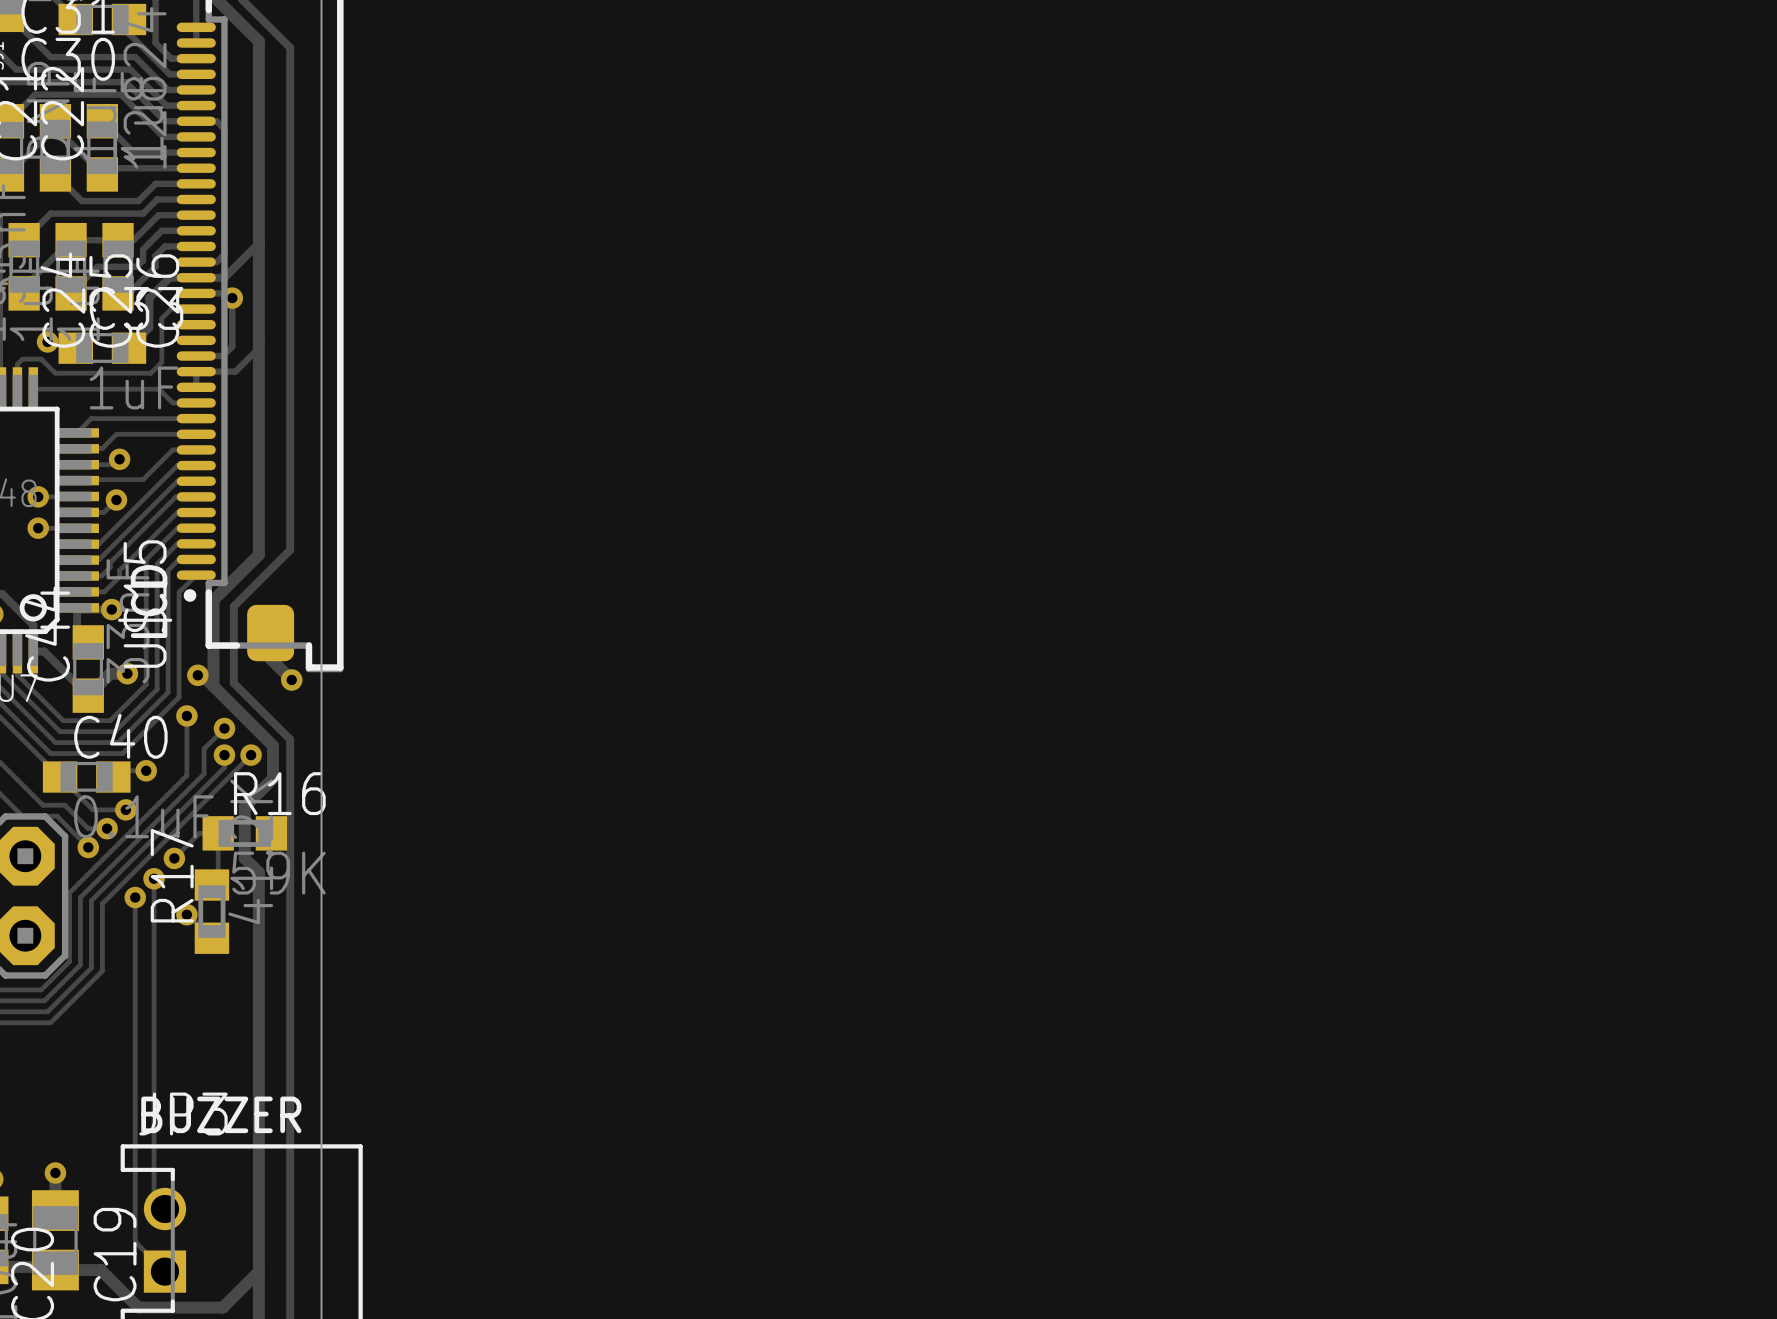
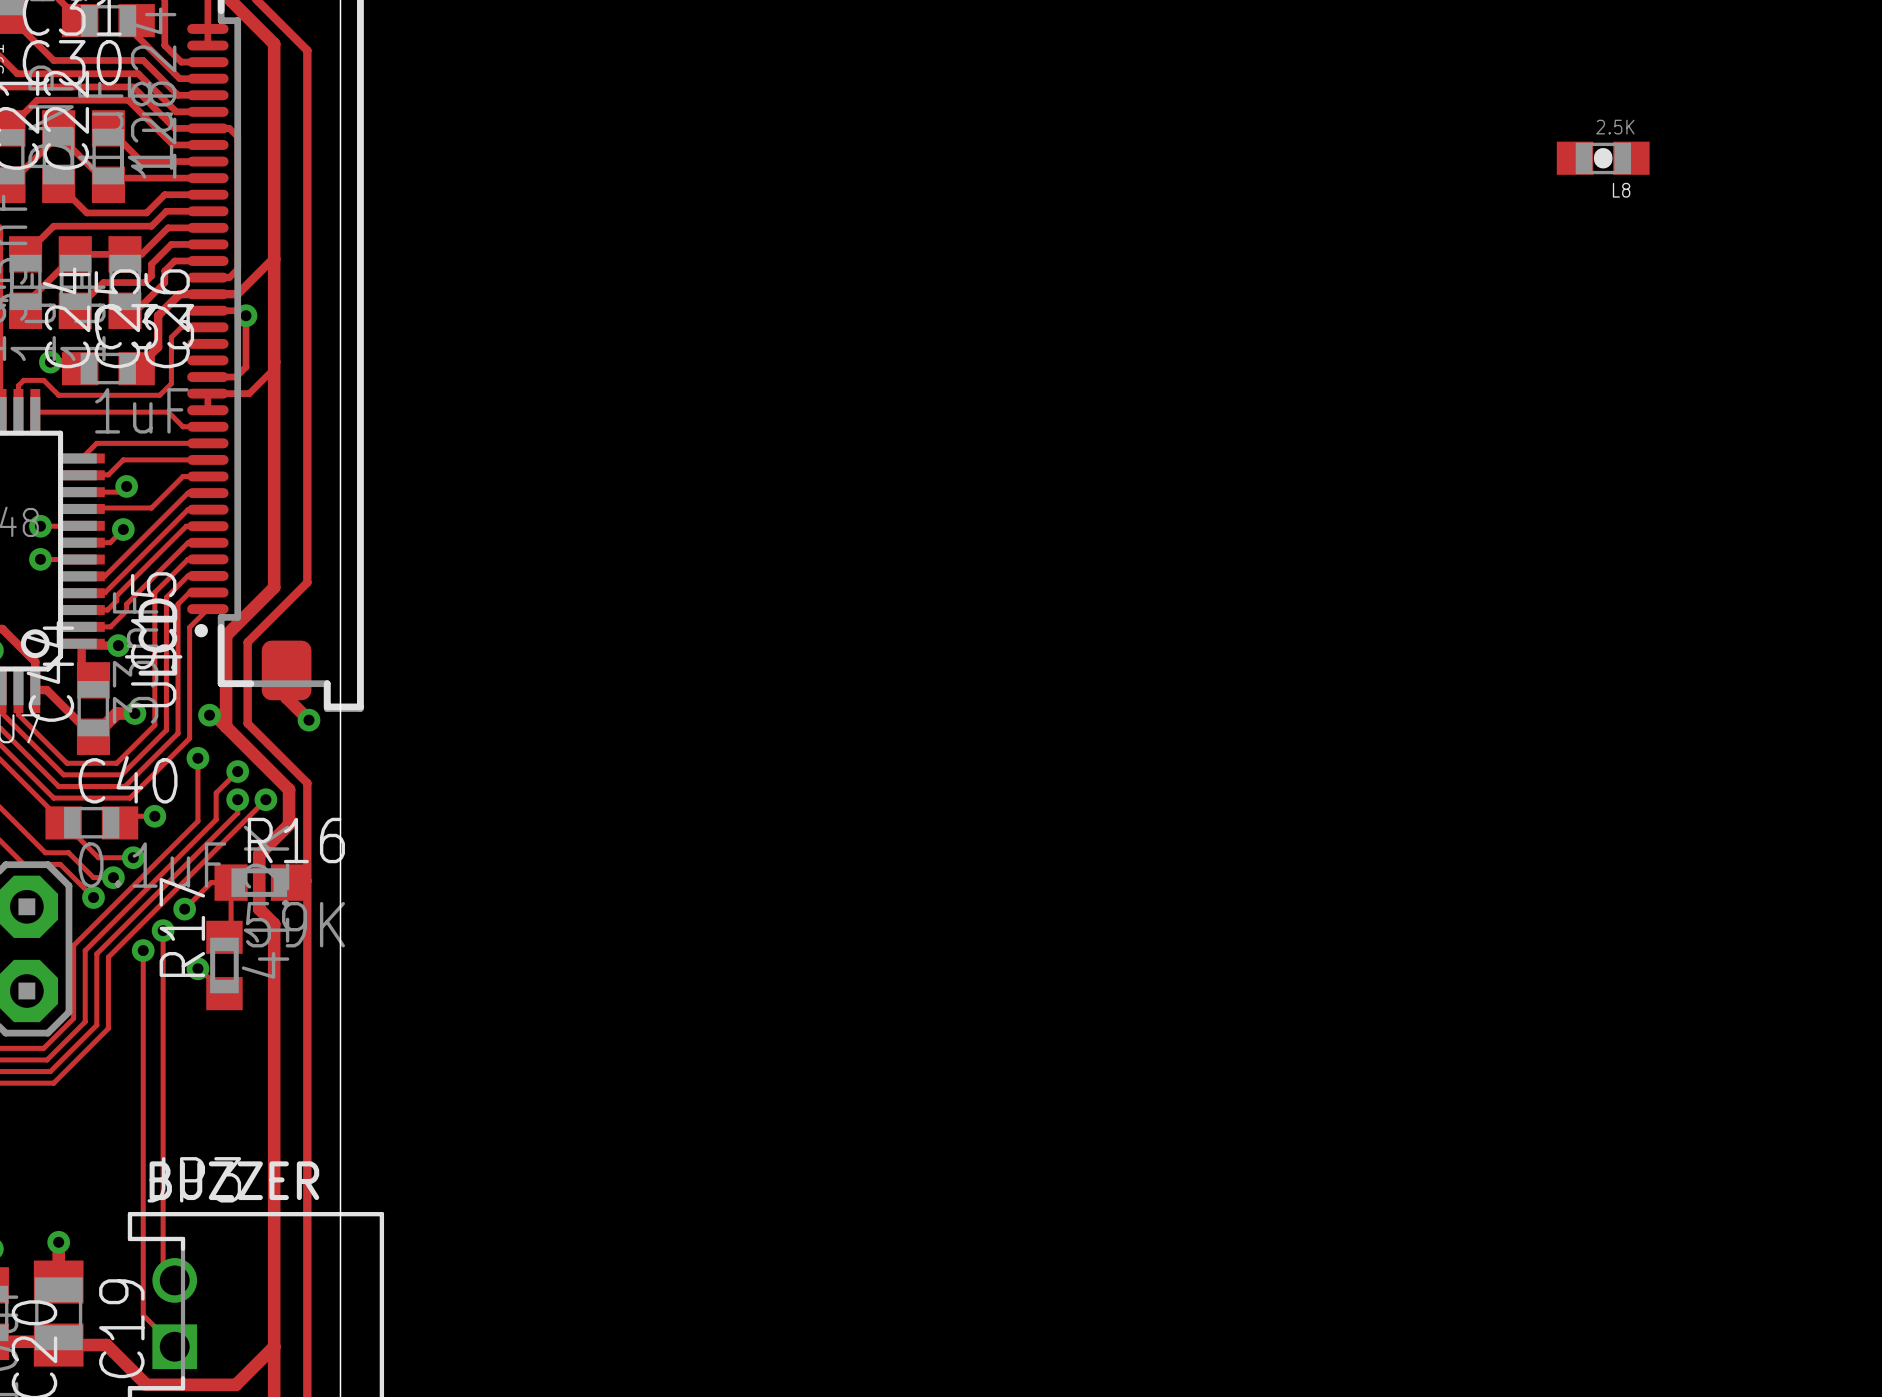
L8: none -> 2.5K (1603, 158)

